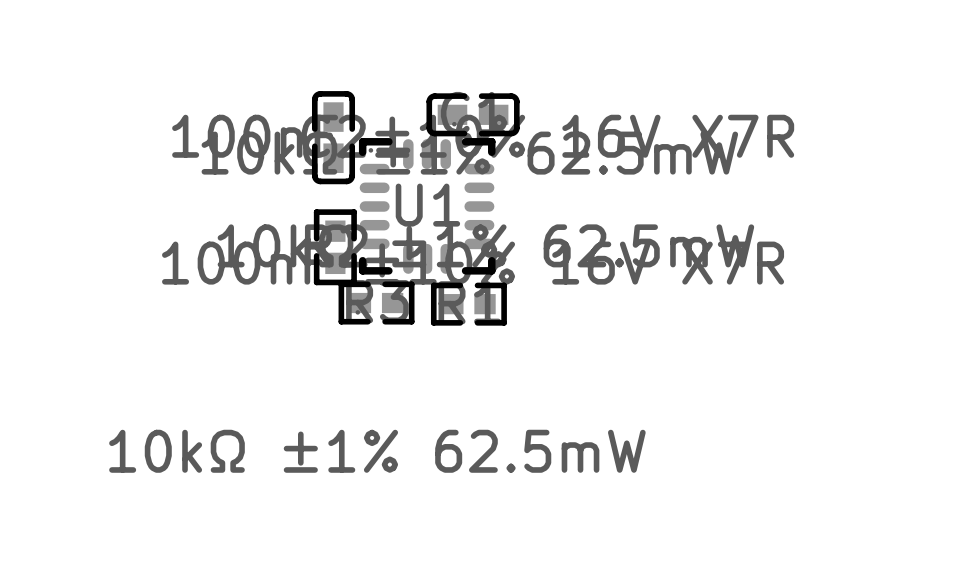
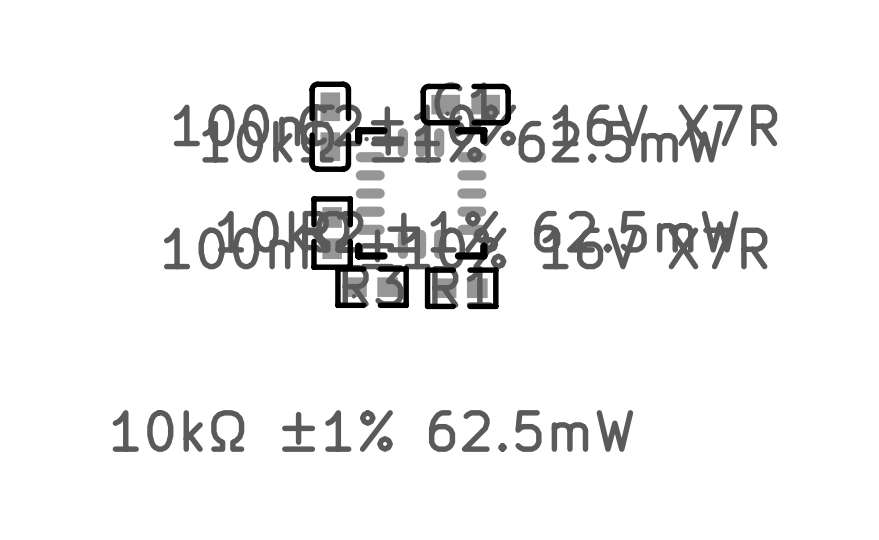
U1 name: U1 (427, 205) -> none

